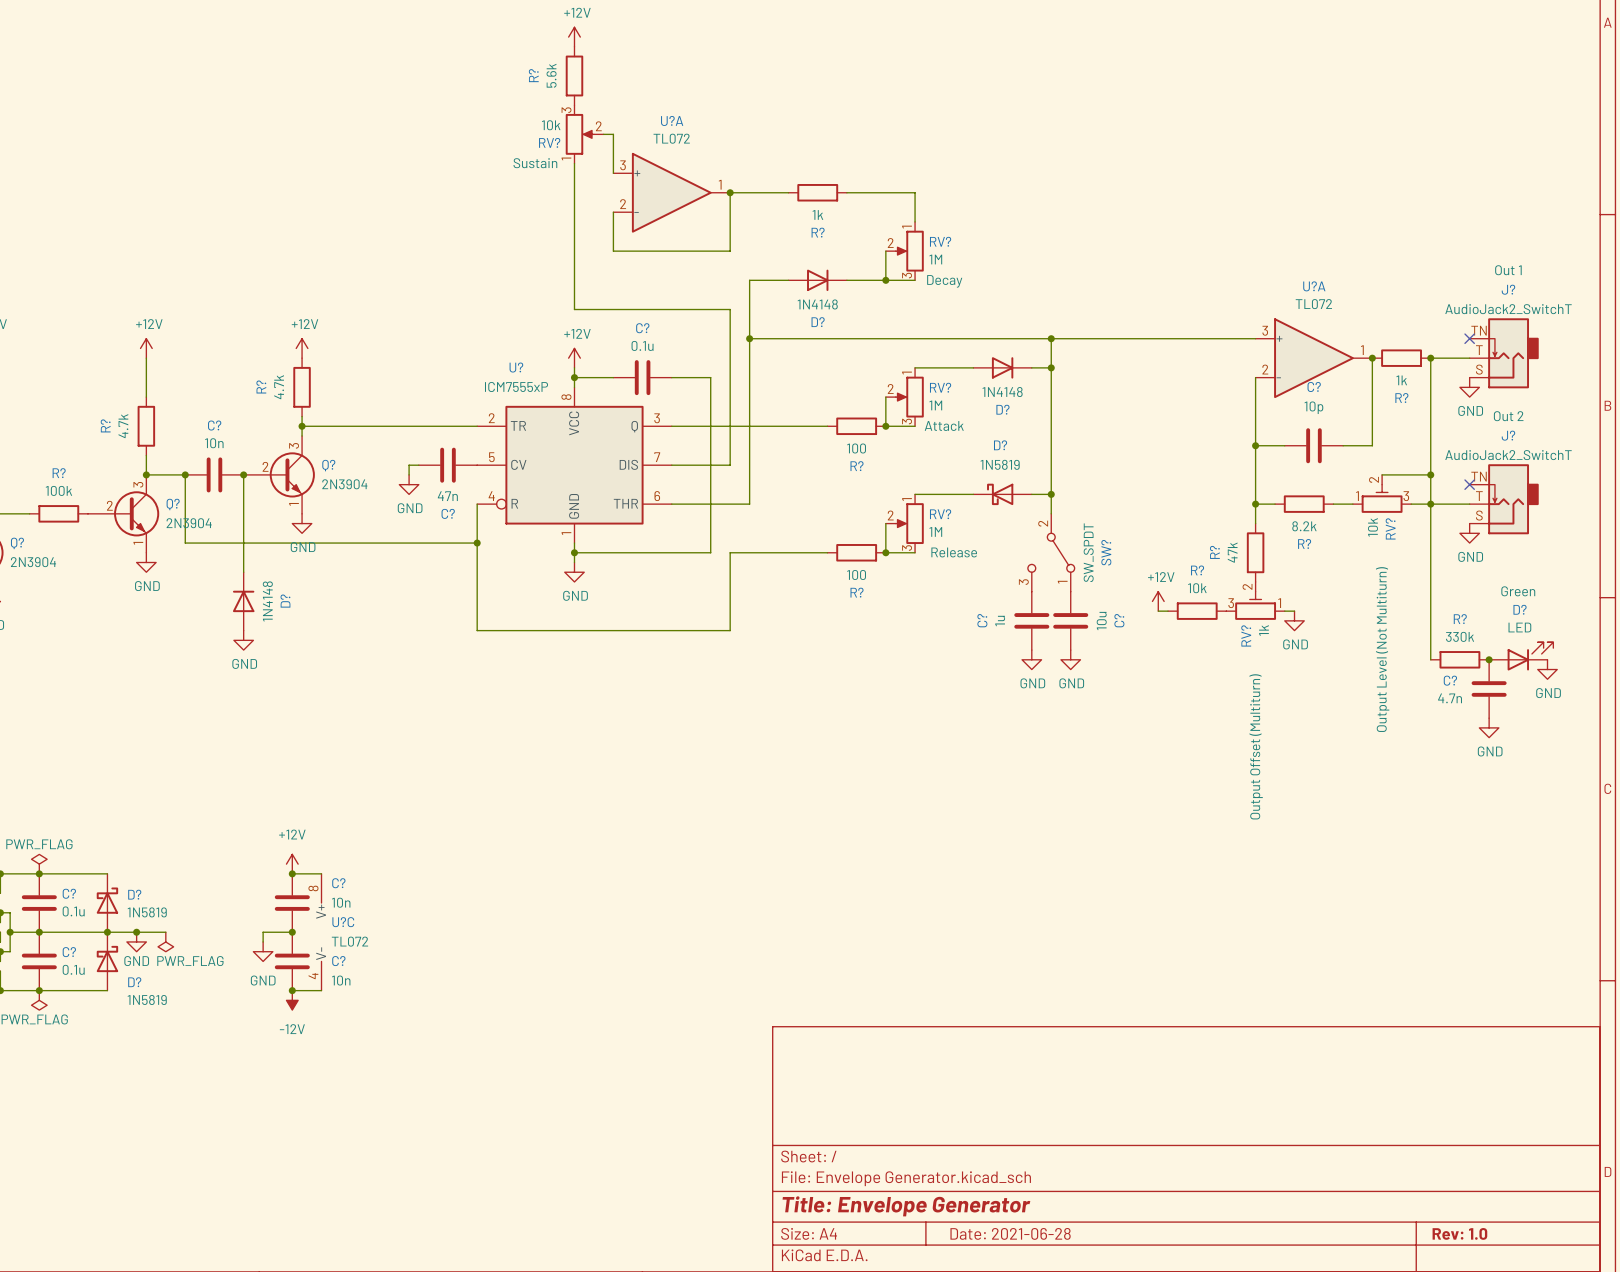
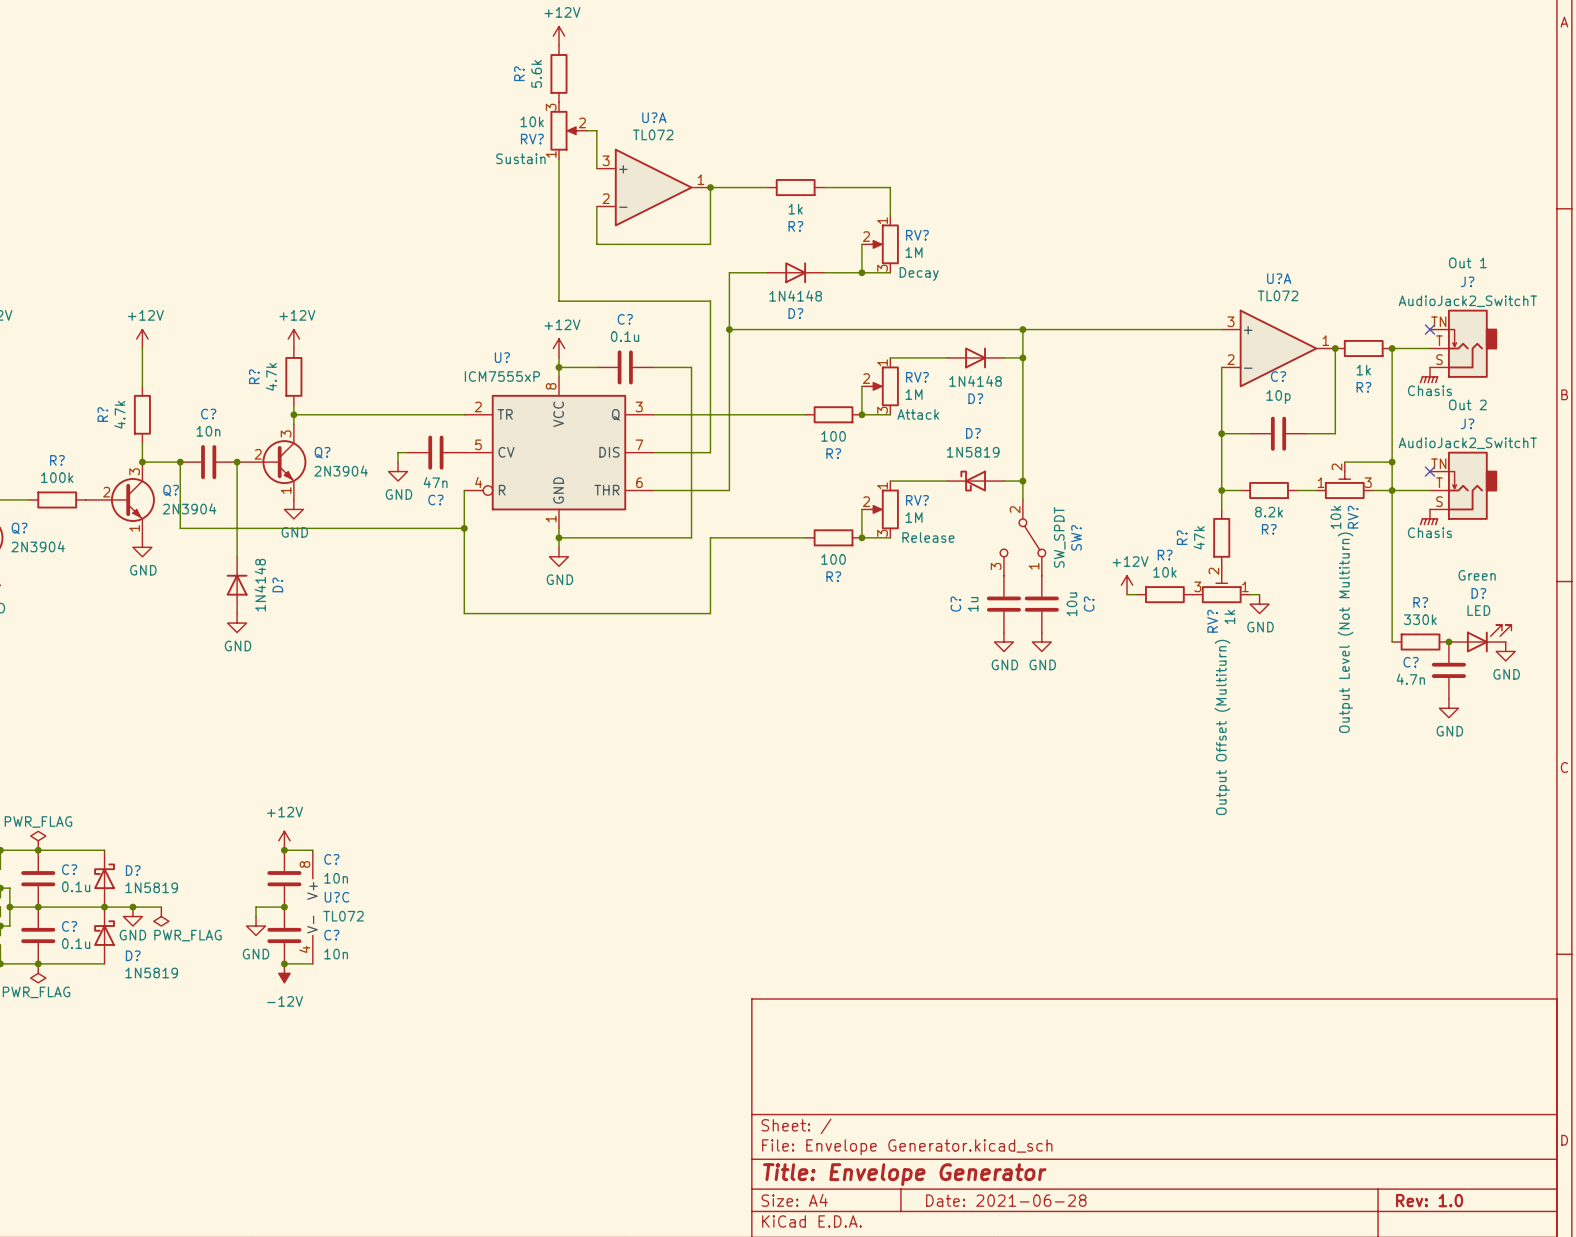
power symbol: GND (1469, 387) -> Chasis (1429, 375)
power symbol: GND (1469, 533) -> Chasis (1429, 517)

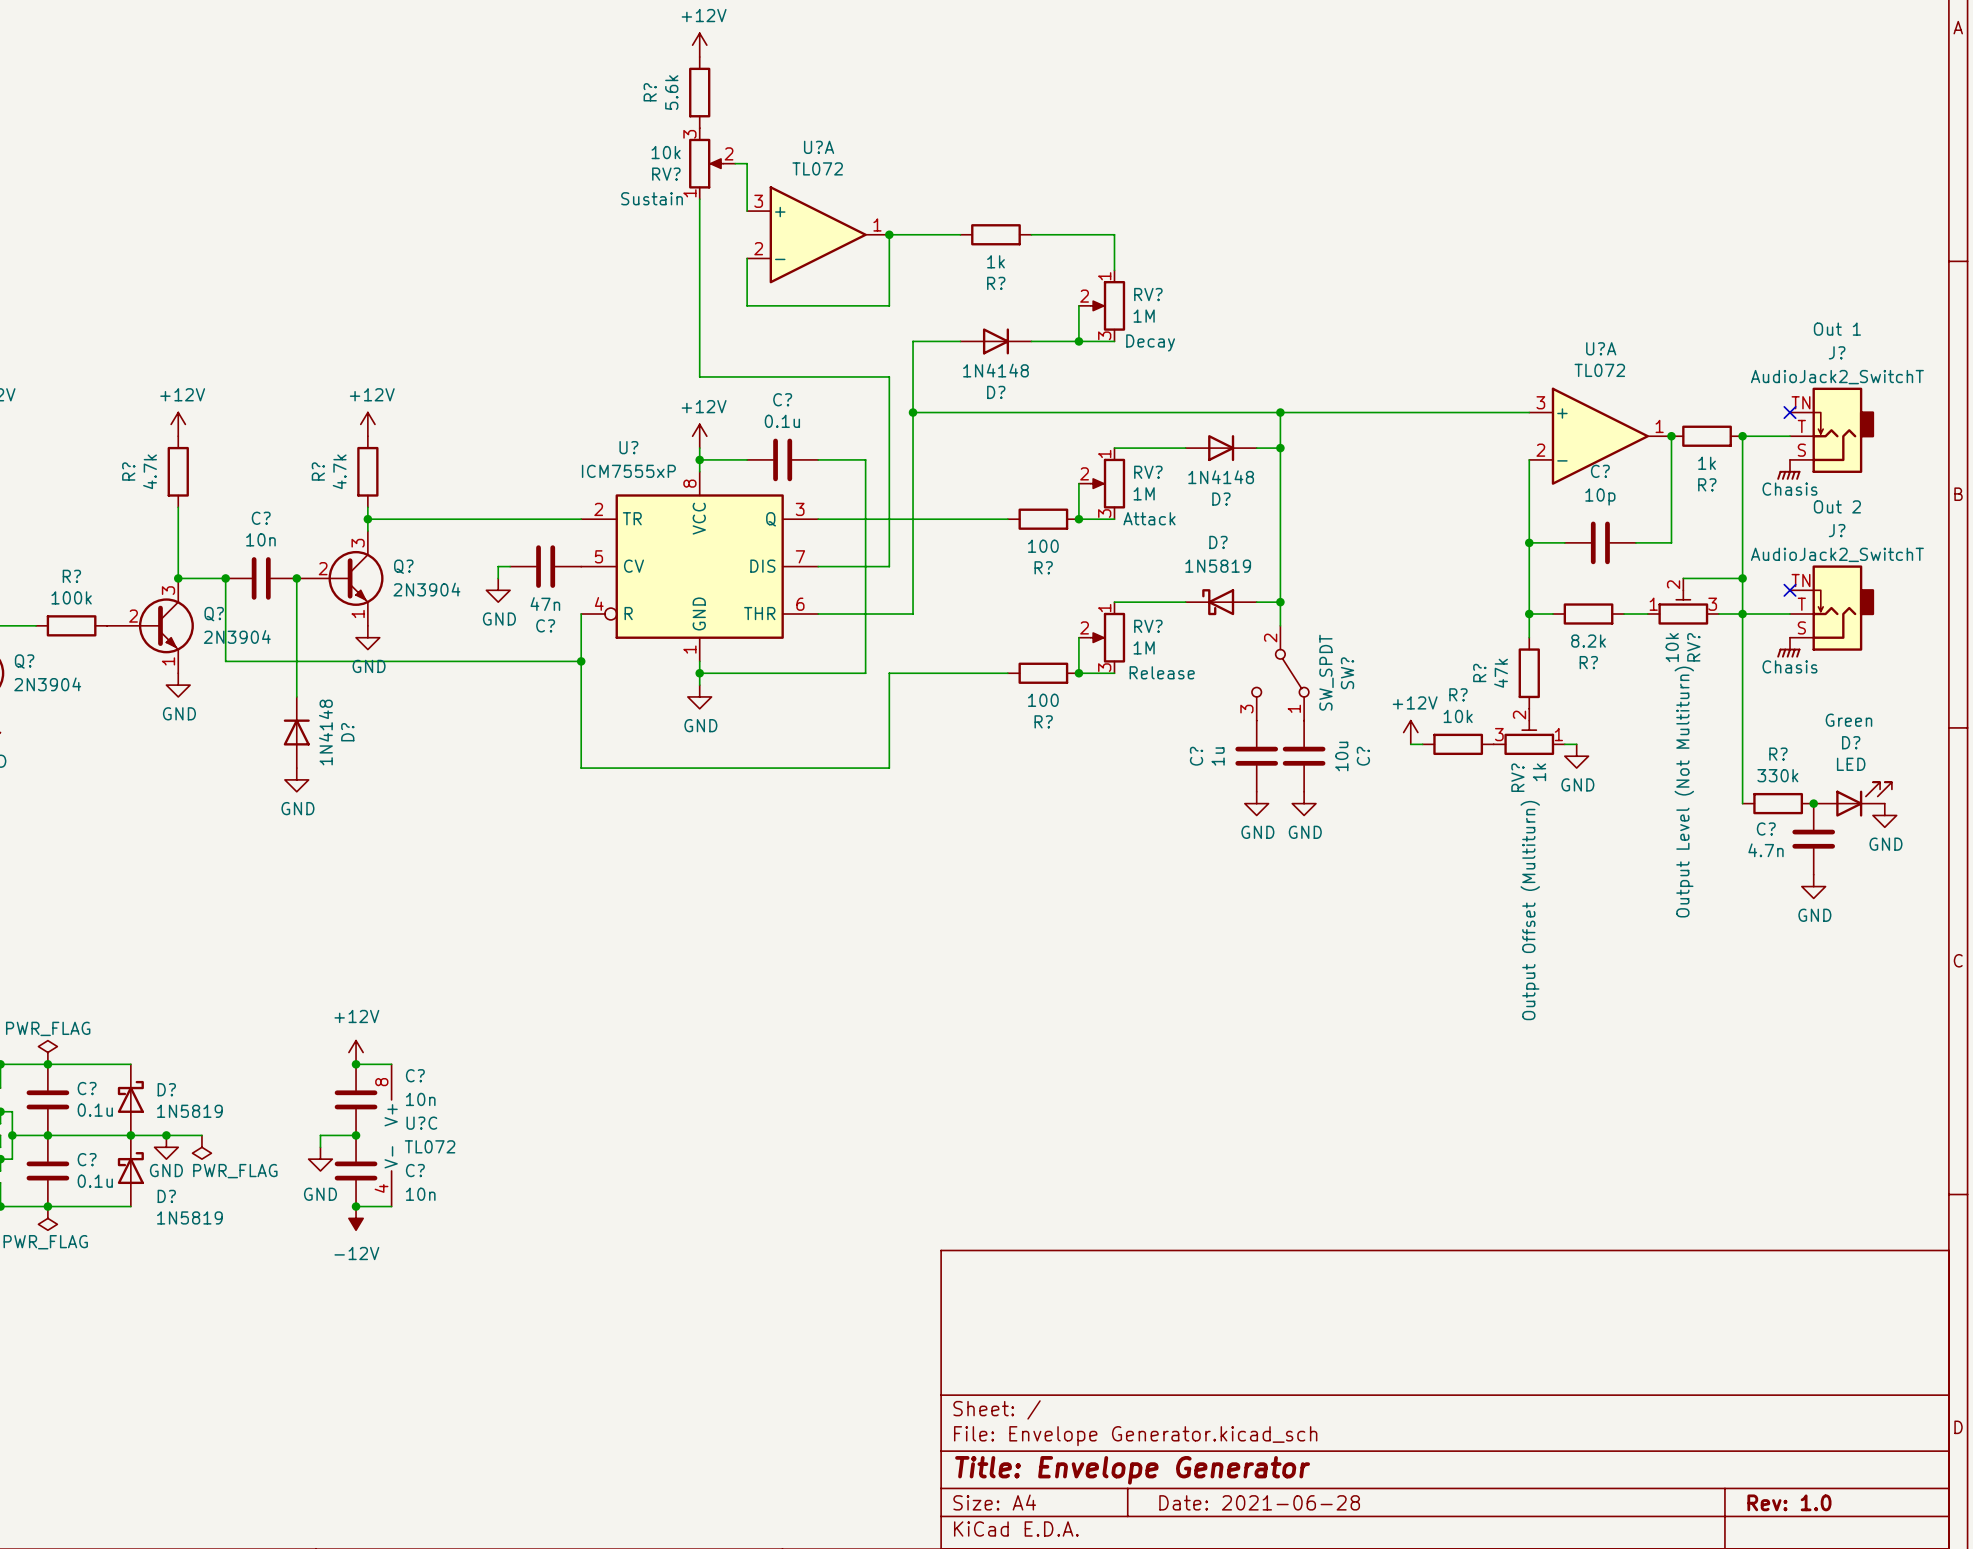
wire: (142, 348) (142, 386) -> (178, 507) (178, 554)
R? position: (142, 414) -> (178, 471)

